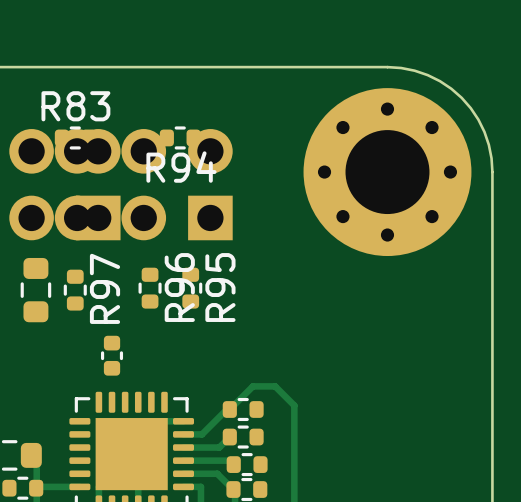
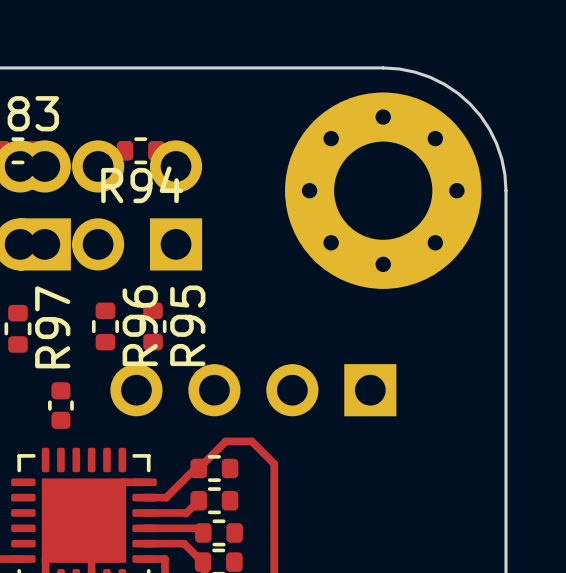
part: none -> (253, 390)

